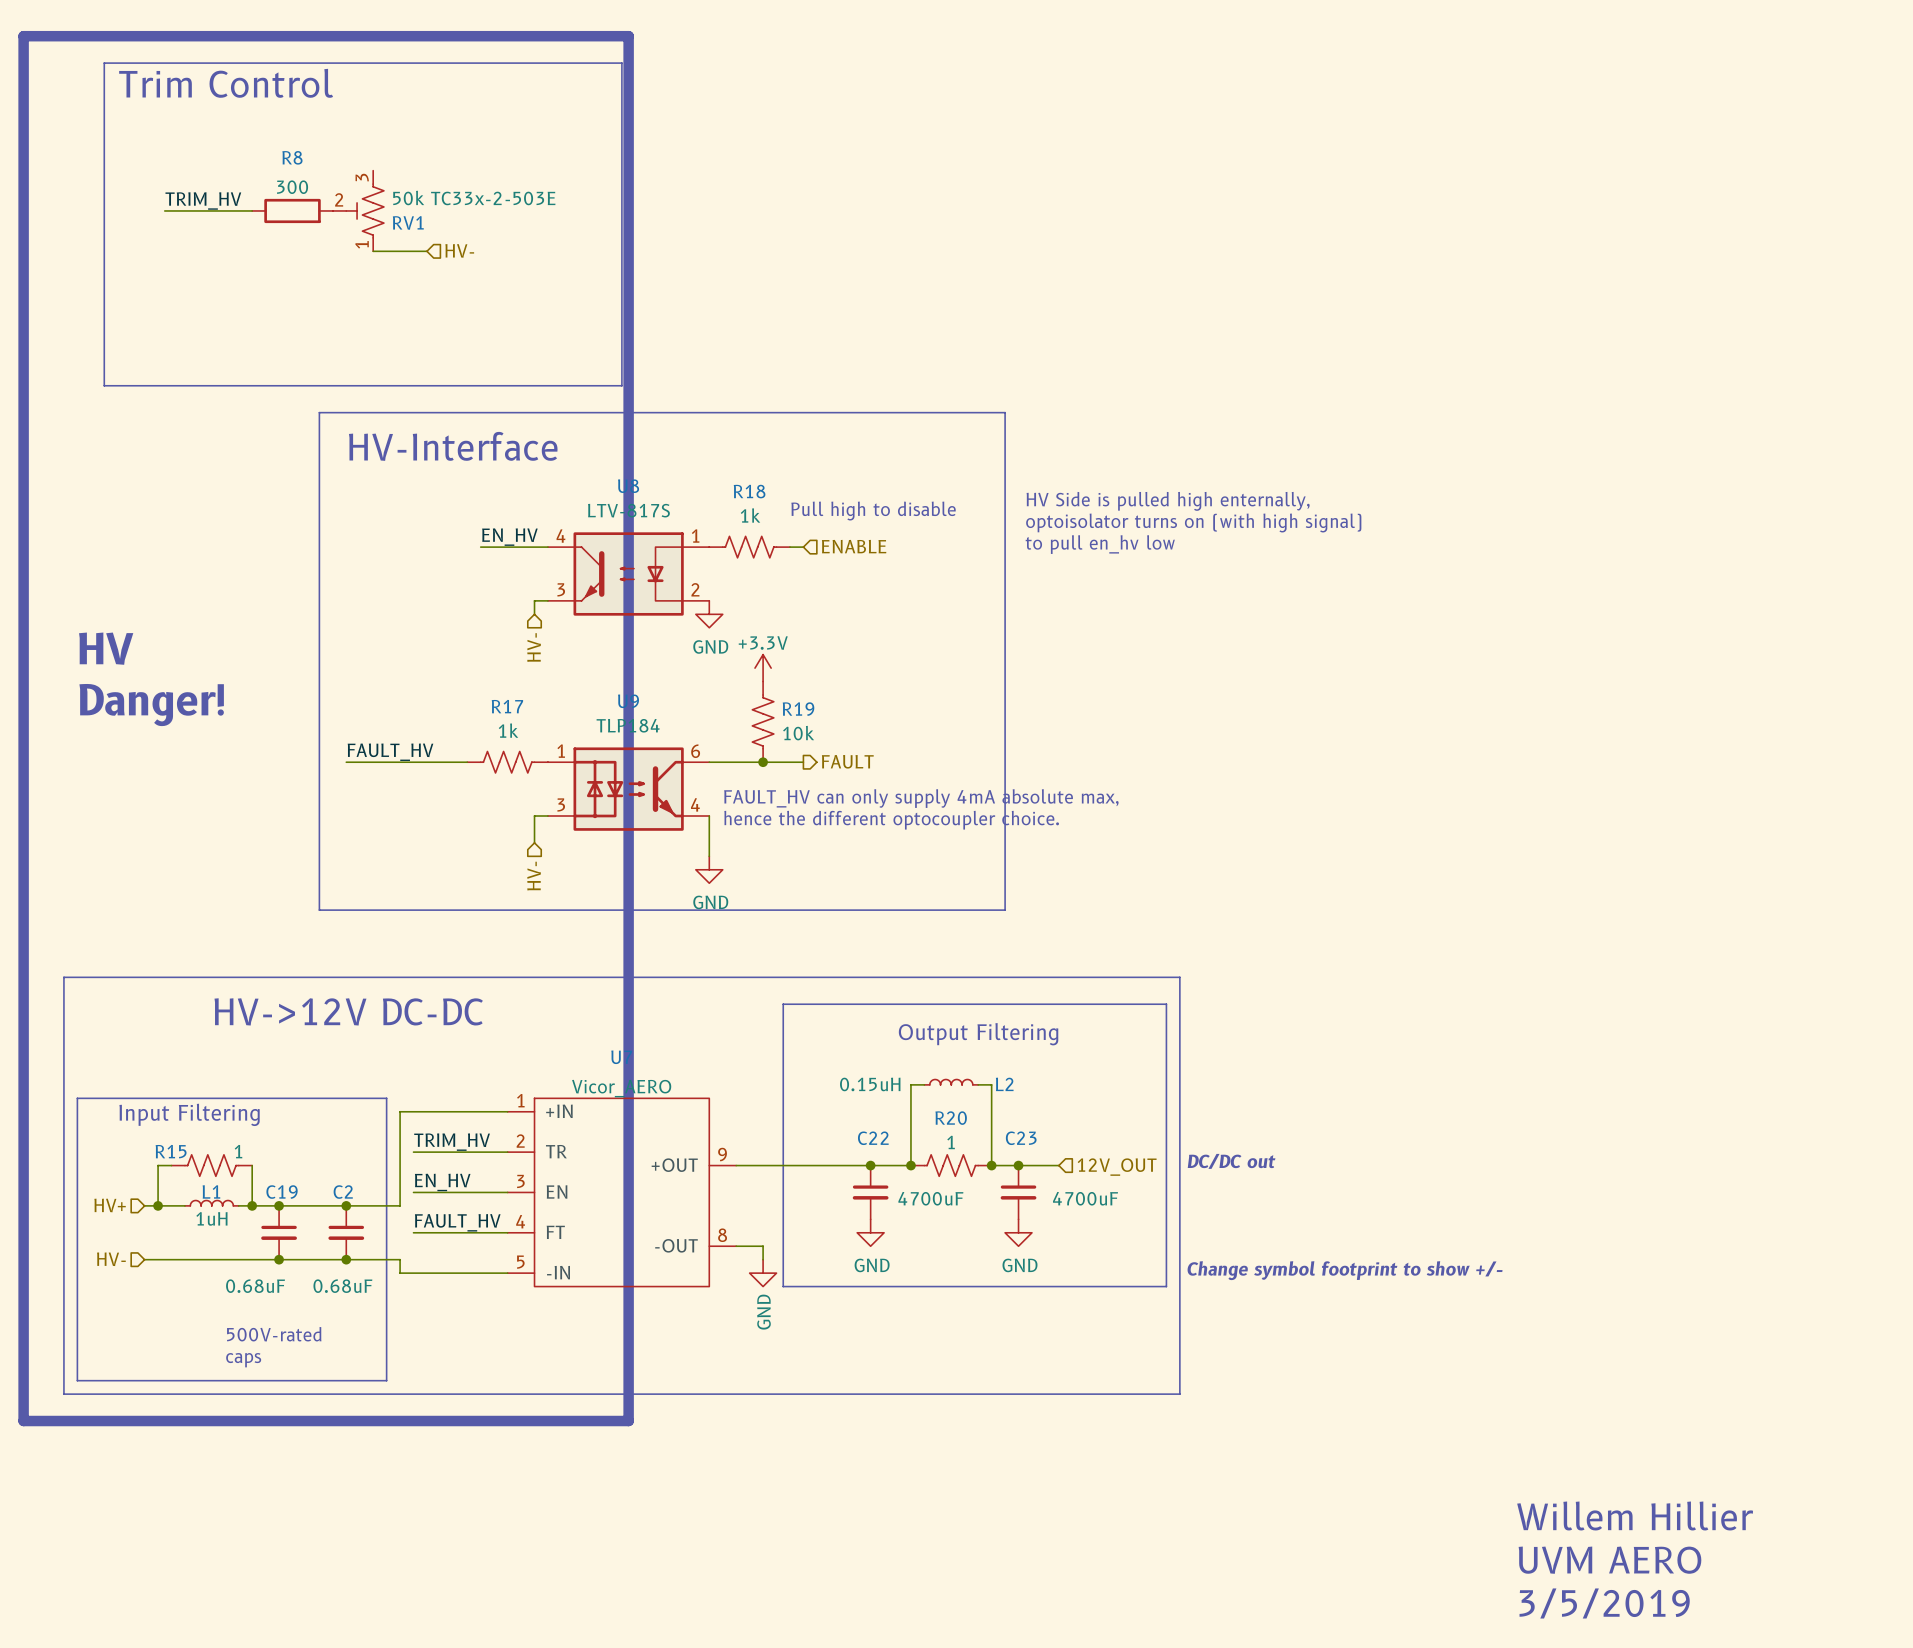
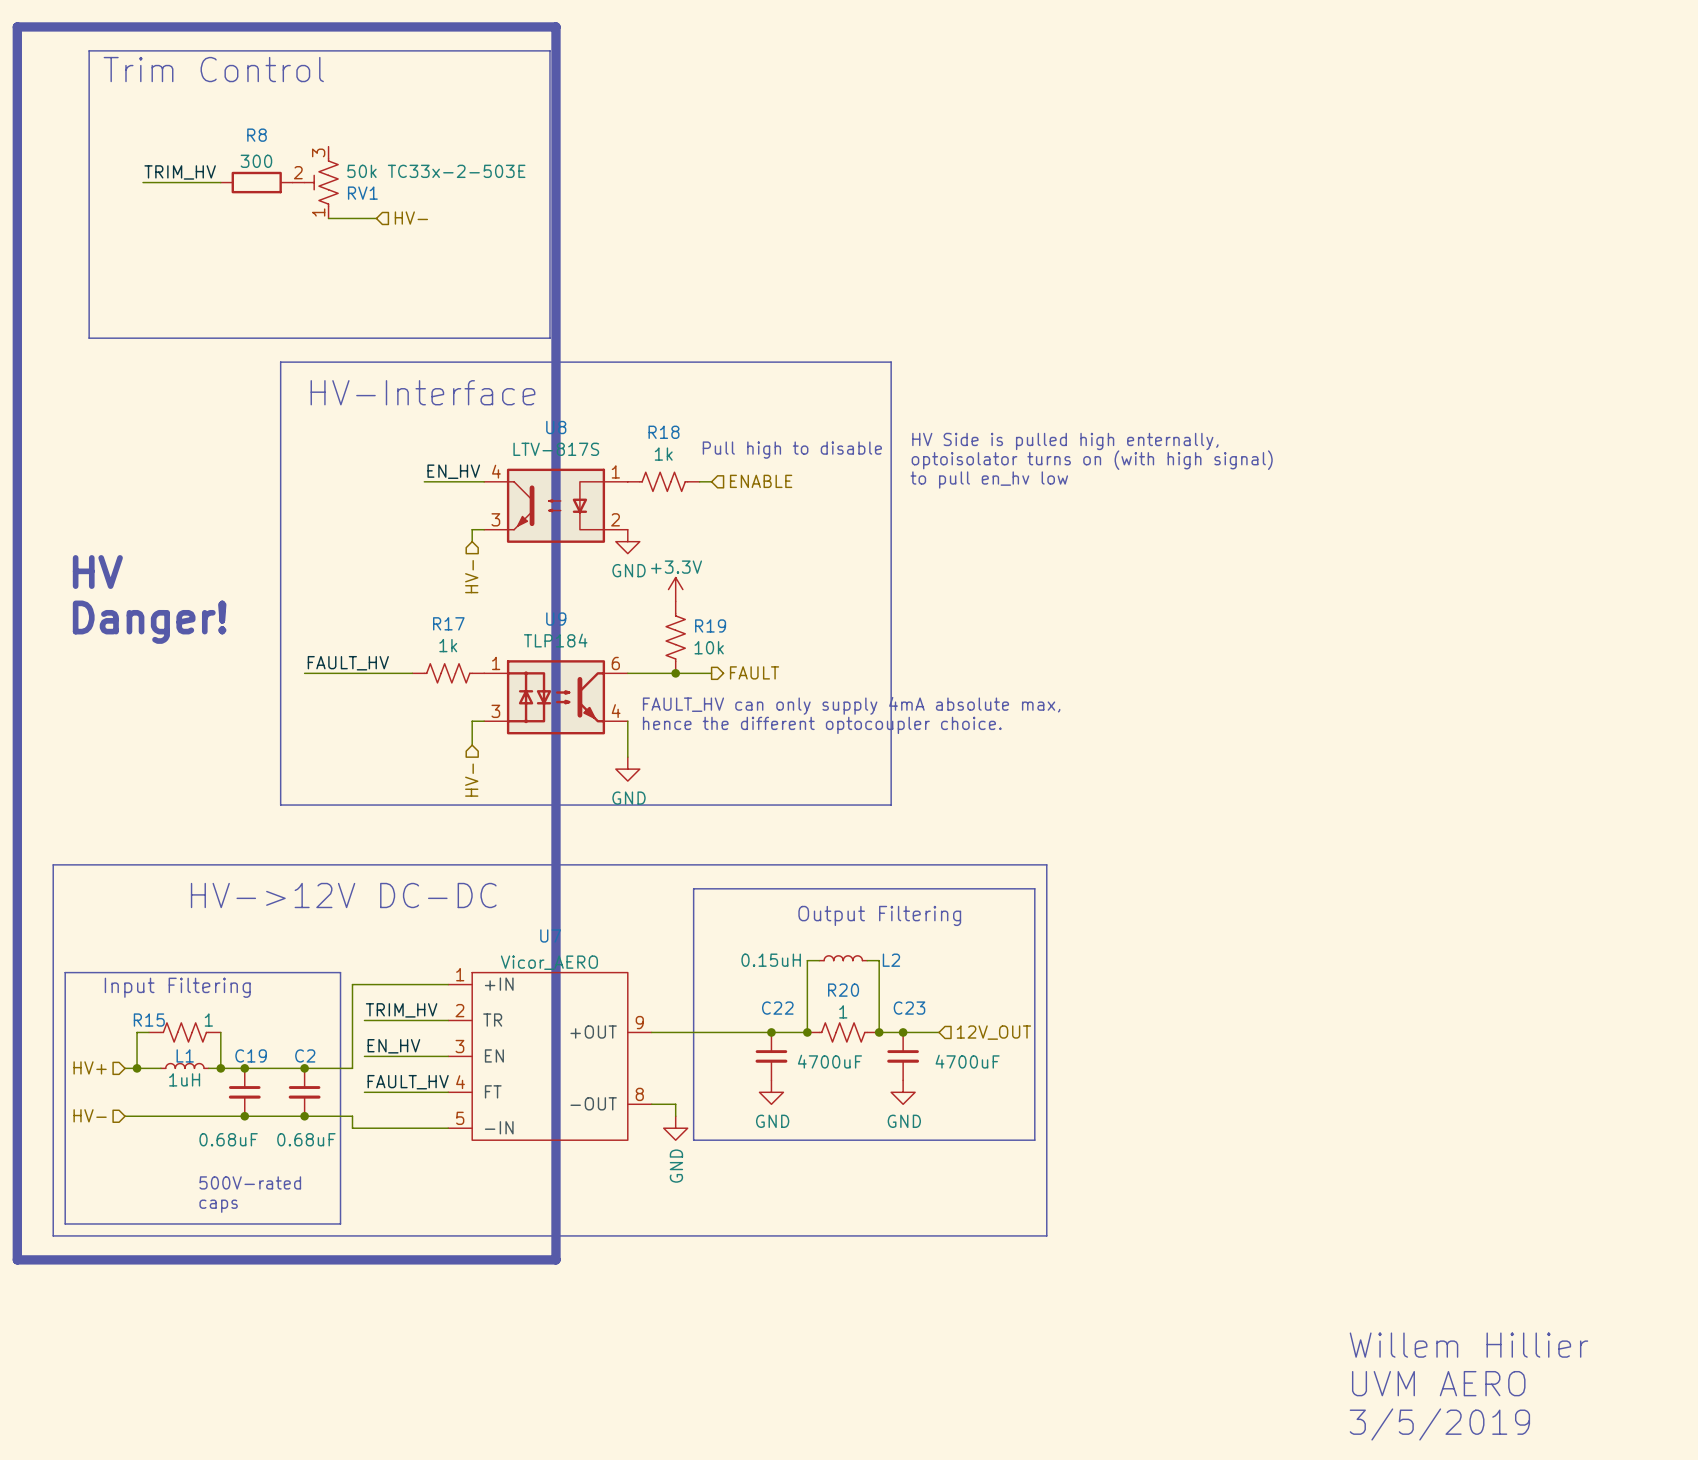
text: DC/DC out (1231, 1161) -> none
text: Change symbol footprint to show +/- (1344, 1270) -> none

